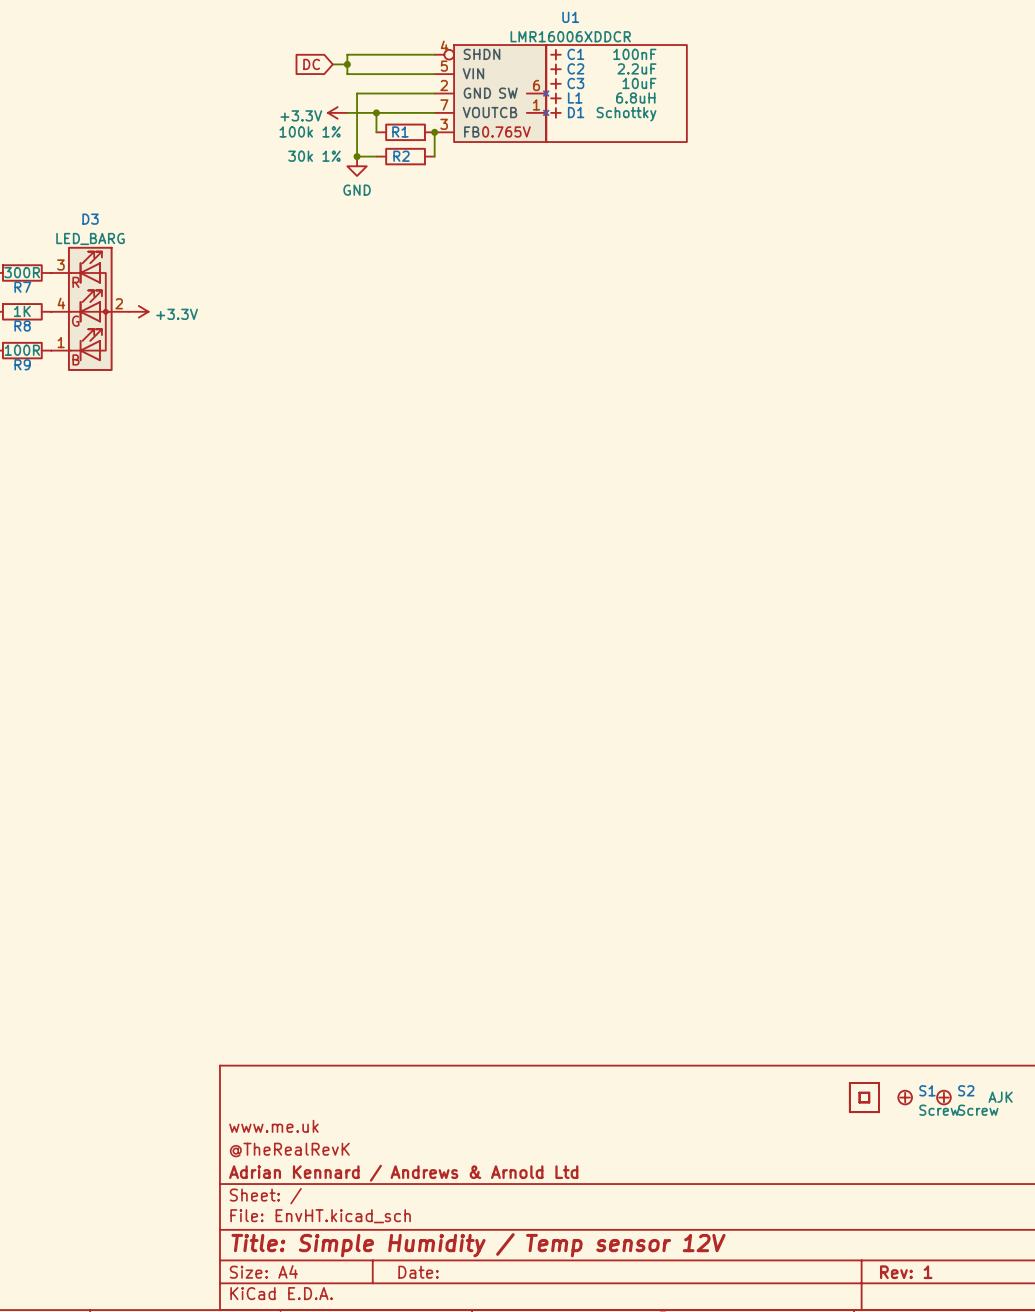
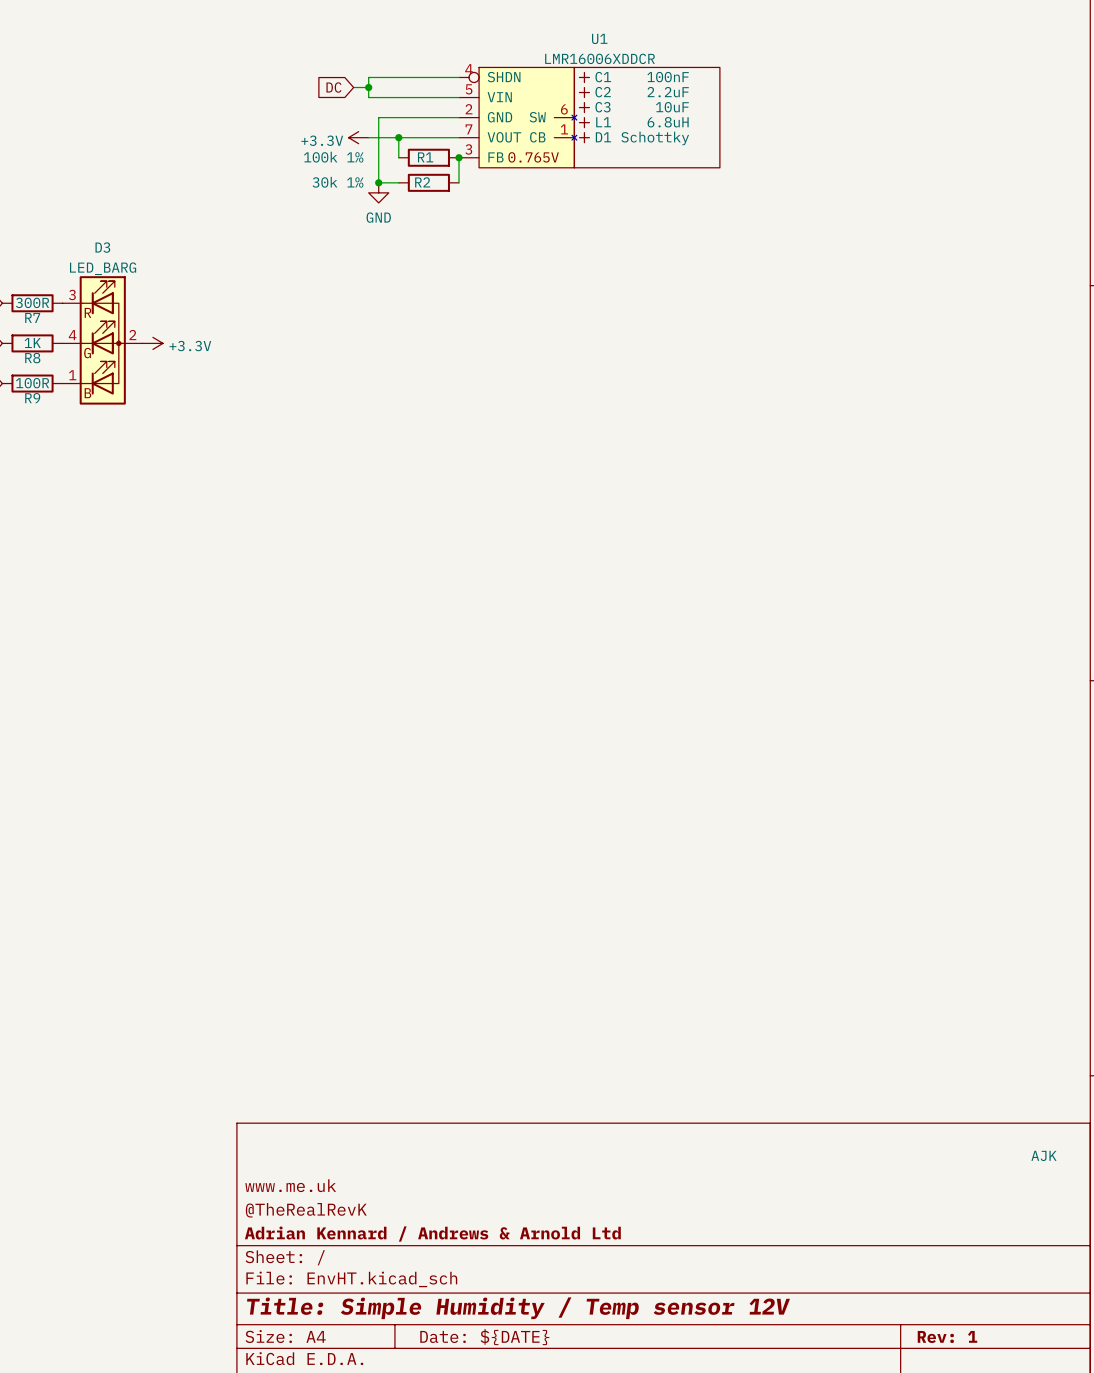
part: (864, 1097) -> none
S1: Screw (905, 1097) -> none
S2: Screw (943, 1097) -> none
title block: Date: (418, 1272) -> Date: ${DATE} (484, 1337)

